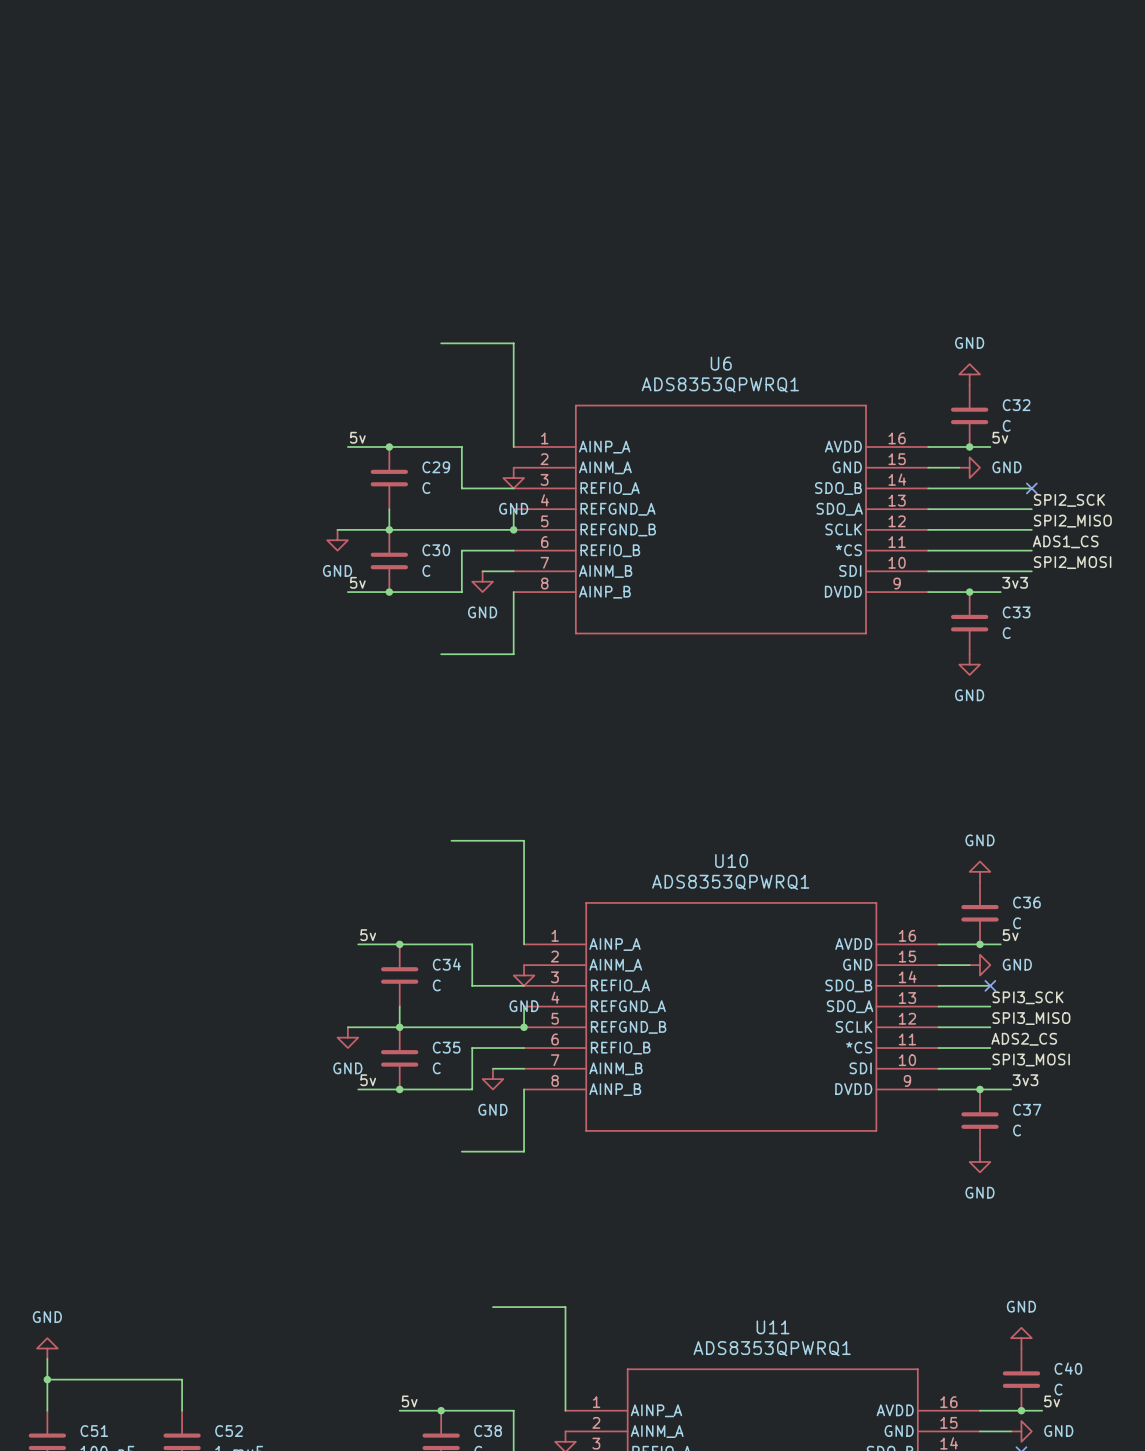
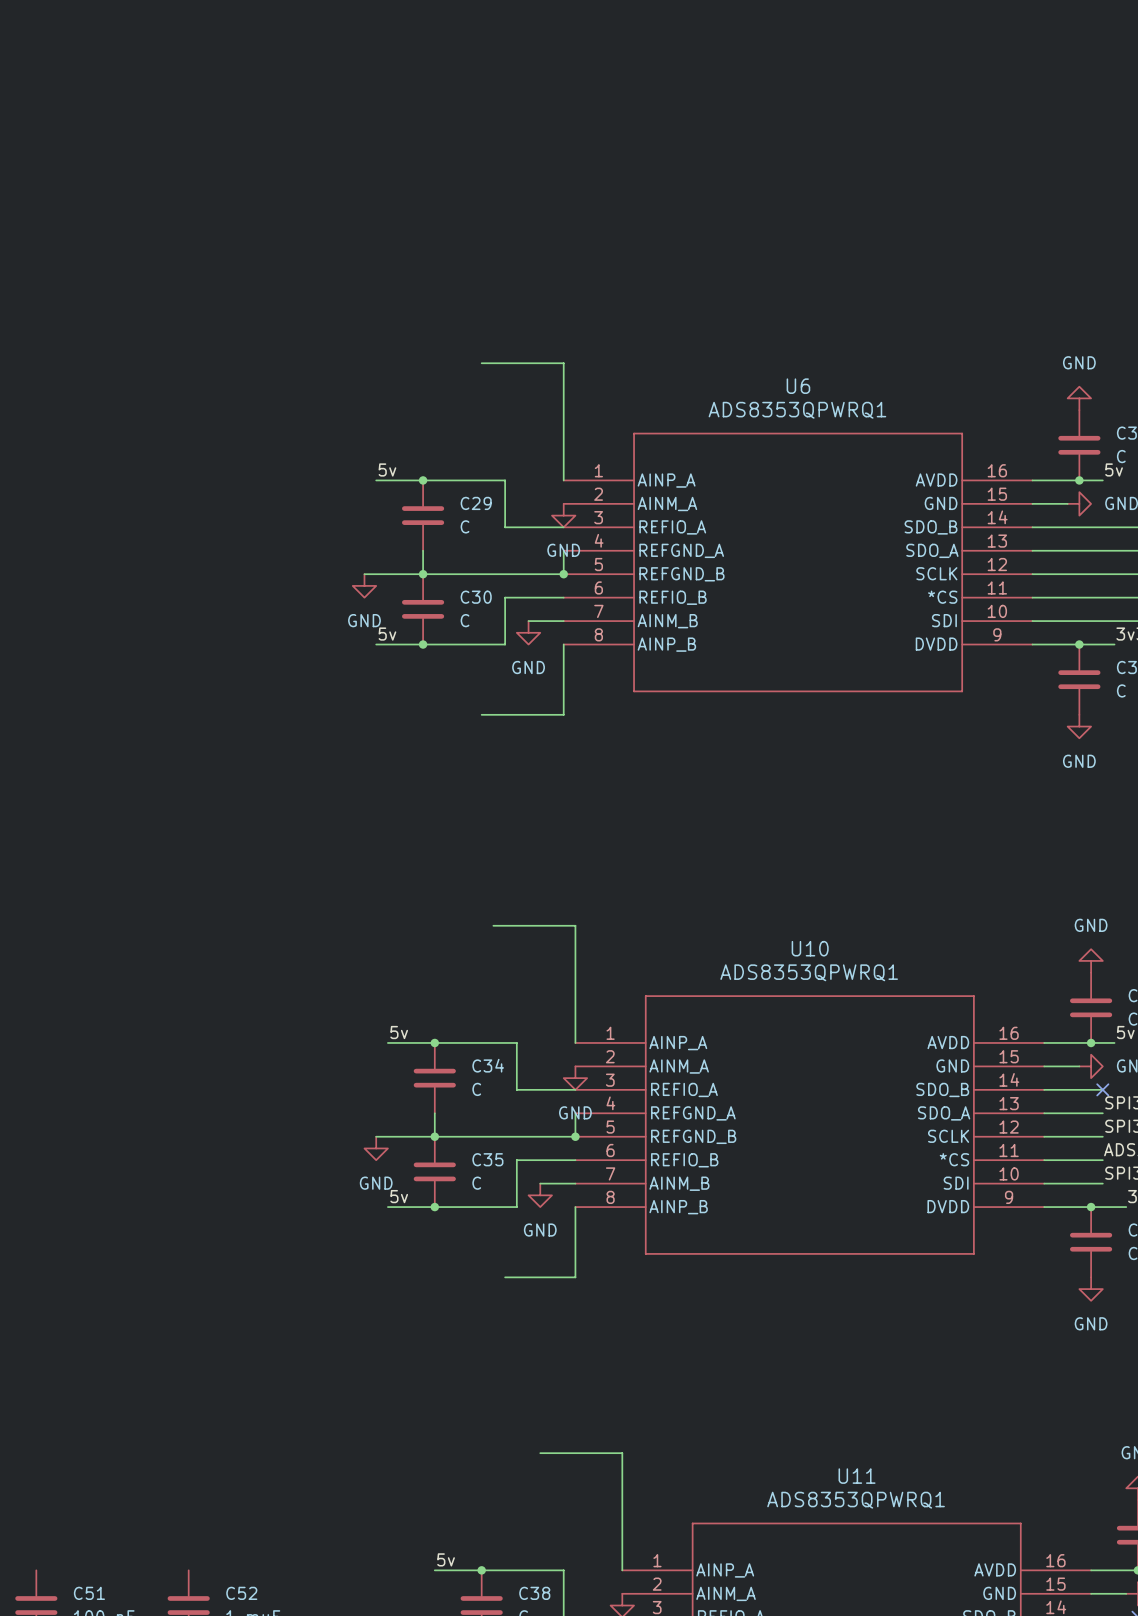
power symbol: GND (47, 1348) -> none
wire: (47, 1358) (47, 1410) -> none
wire: (47, 1379) (182, 1379) (182, 1410) -> none
junction: (47, 1379) -> none

